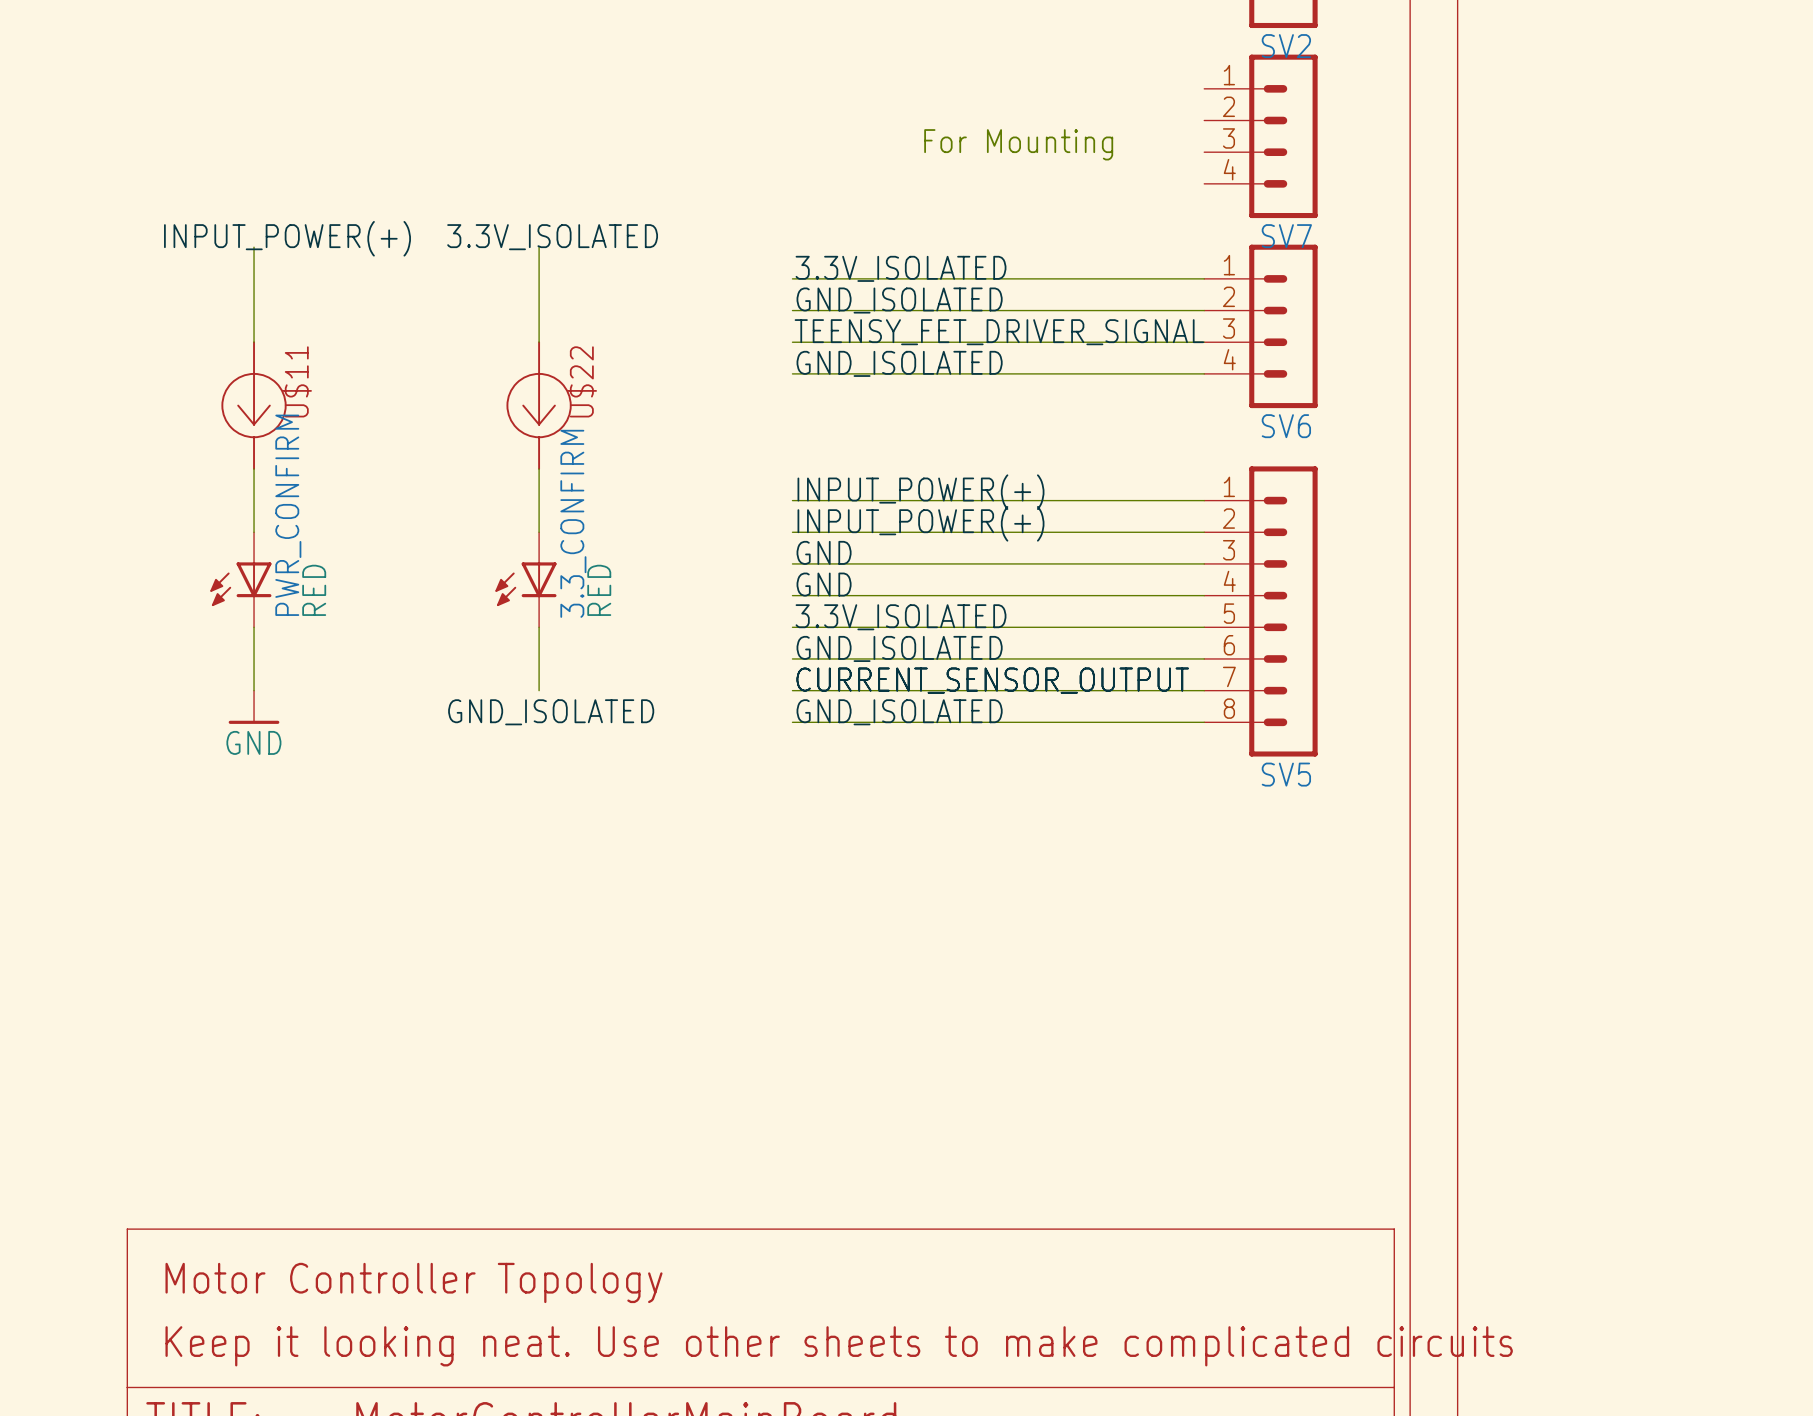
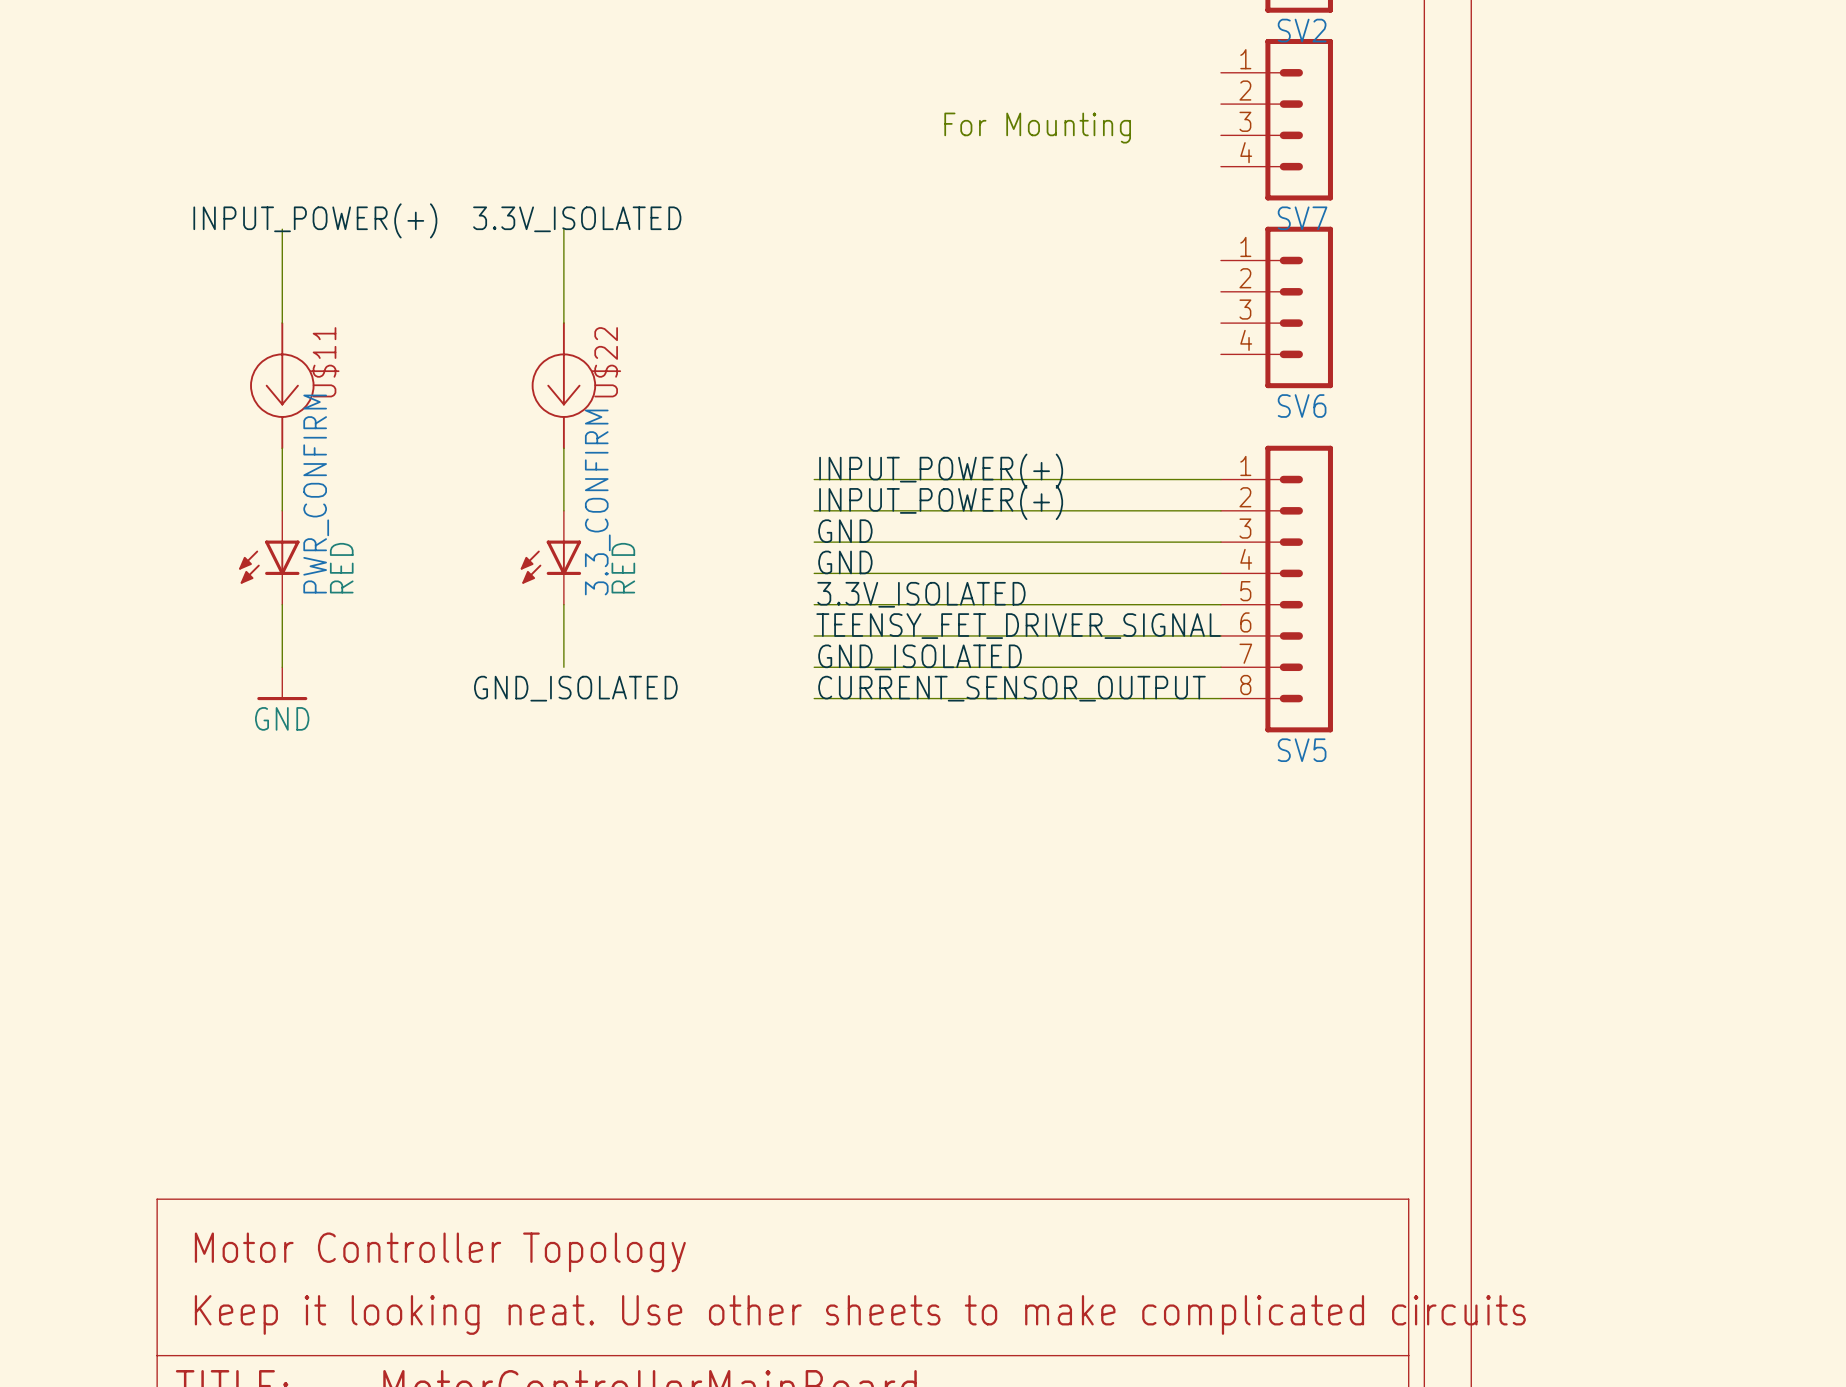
label: 3.3V_ISOLATED (901, 268) -> none
wire: (792, 278) (1204, 278) -> none
label: GND_ISOLATED (899, 300) -> none
wire: (792, 310) (1204, 310) -> none
label: TEENSY_FET_DRIVER_SIGNAL (999, 332) -> none
wire: (792, 342) (1204, 342) -> none
label: GND_ISOLATED (899, 363) -> none
wire: (792, 373) (1204, 373) -> none
label: GND_ISOLATED (899, 648) -> TEENSY_FET_DRIVER_SIGNAL (1018, 626)
label: CURRENT_SENSOR_OUTPUT (992, 680) -> GND_ISOLATED (920, 657)
label: GND_ISOLATED (899, 712) -> CURRENT_SENSOR_OUTPUT (1012, 688)

